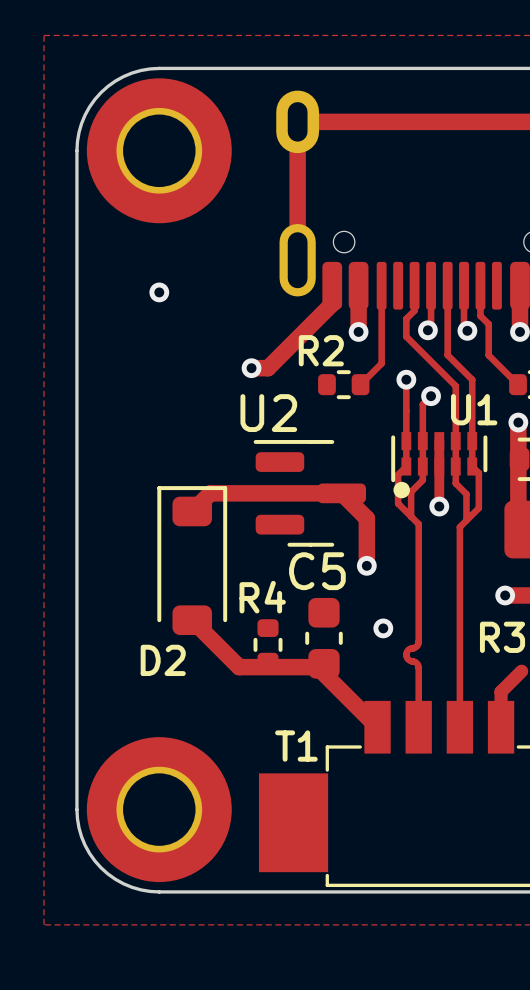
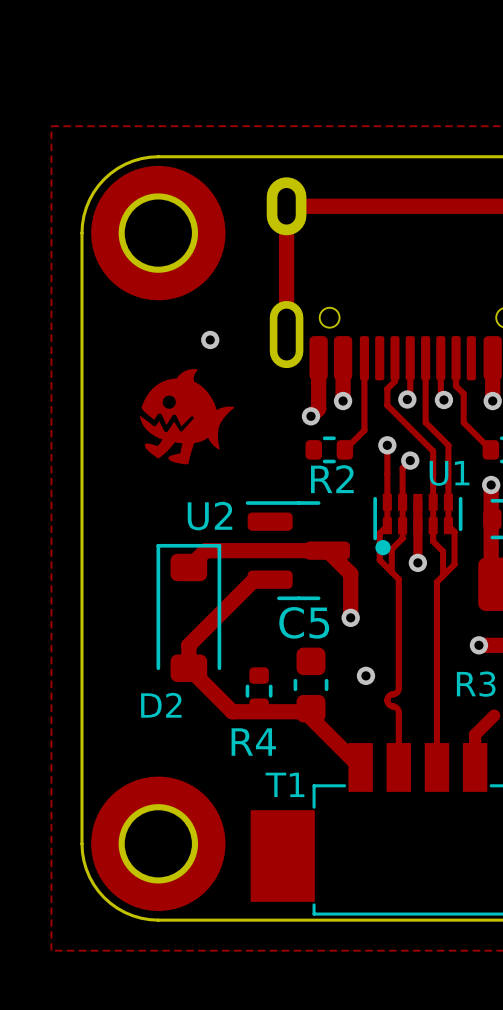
via: none -> (210, 339)
via: (159, 292) -> none
drawing: none -> [139, 369, 235, 465]
track: (332, 303) (268, 368) (251, 368) -> (318, 375) (318, 408) (311, 416)
via: none -> (311, 416)
R2 name position: R2 (321, 350) -> R2 (332, 479)
via: (251, 368) -> none
U2 name position: U2 (268, 413) -> U2 (209, 516)
track: none -> (270, 579) (254, 579) (188, 645) (188, 668)
R4 name position: R4 (262, 597) -> R4 (253, 742)

